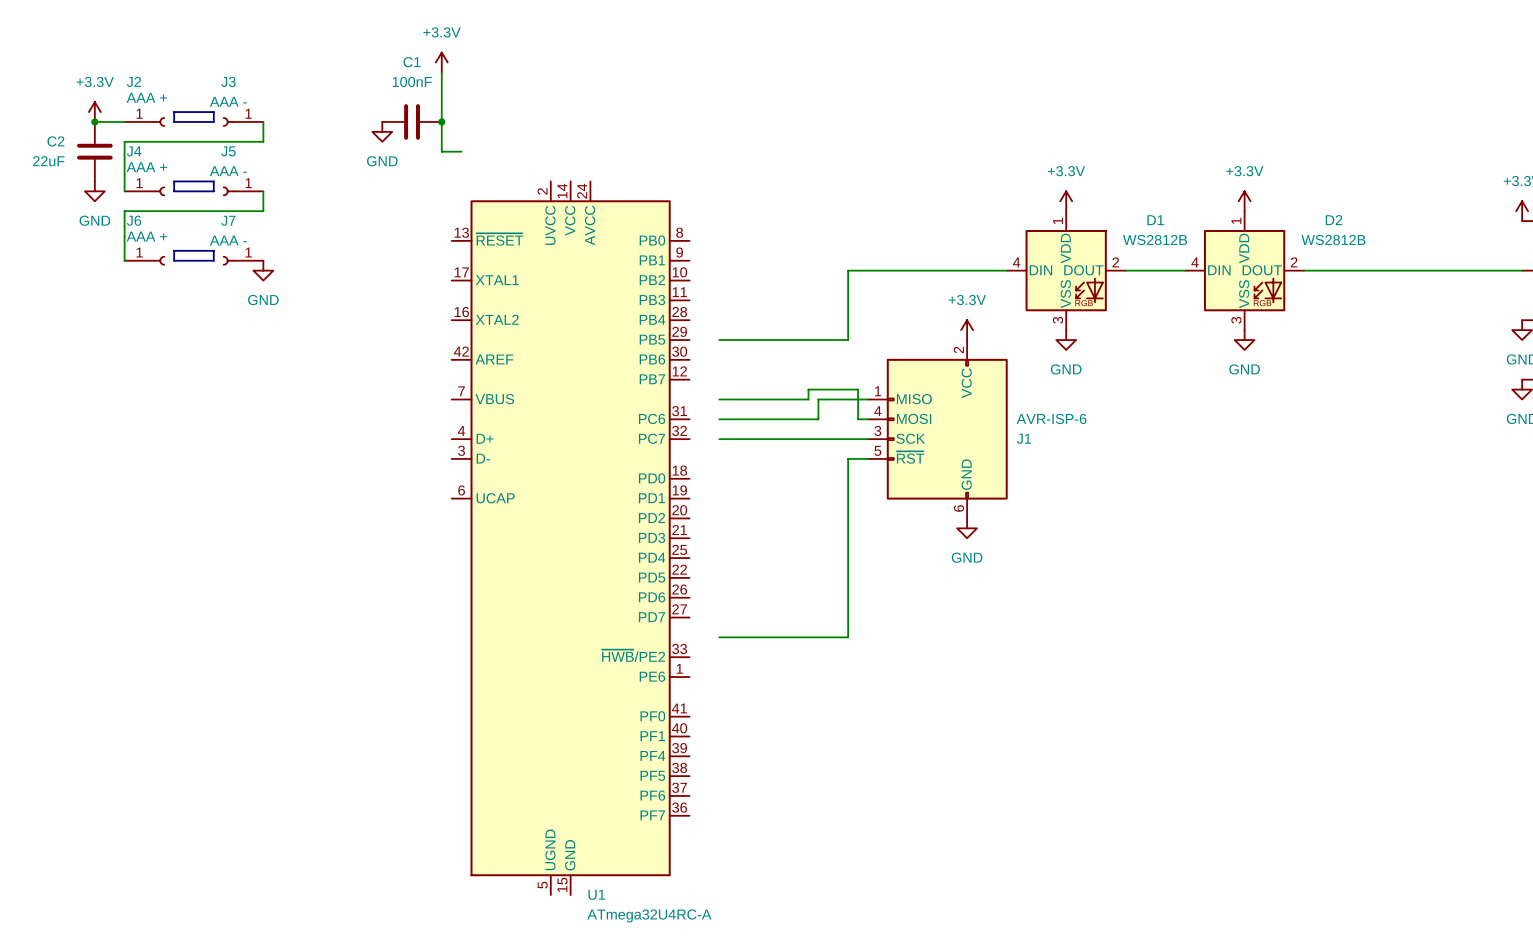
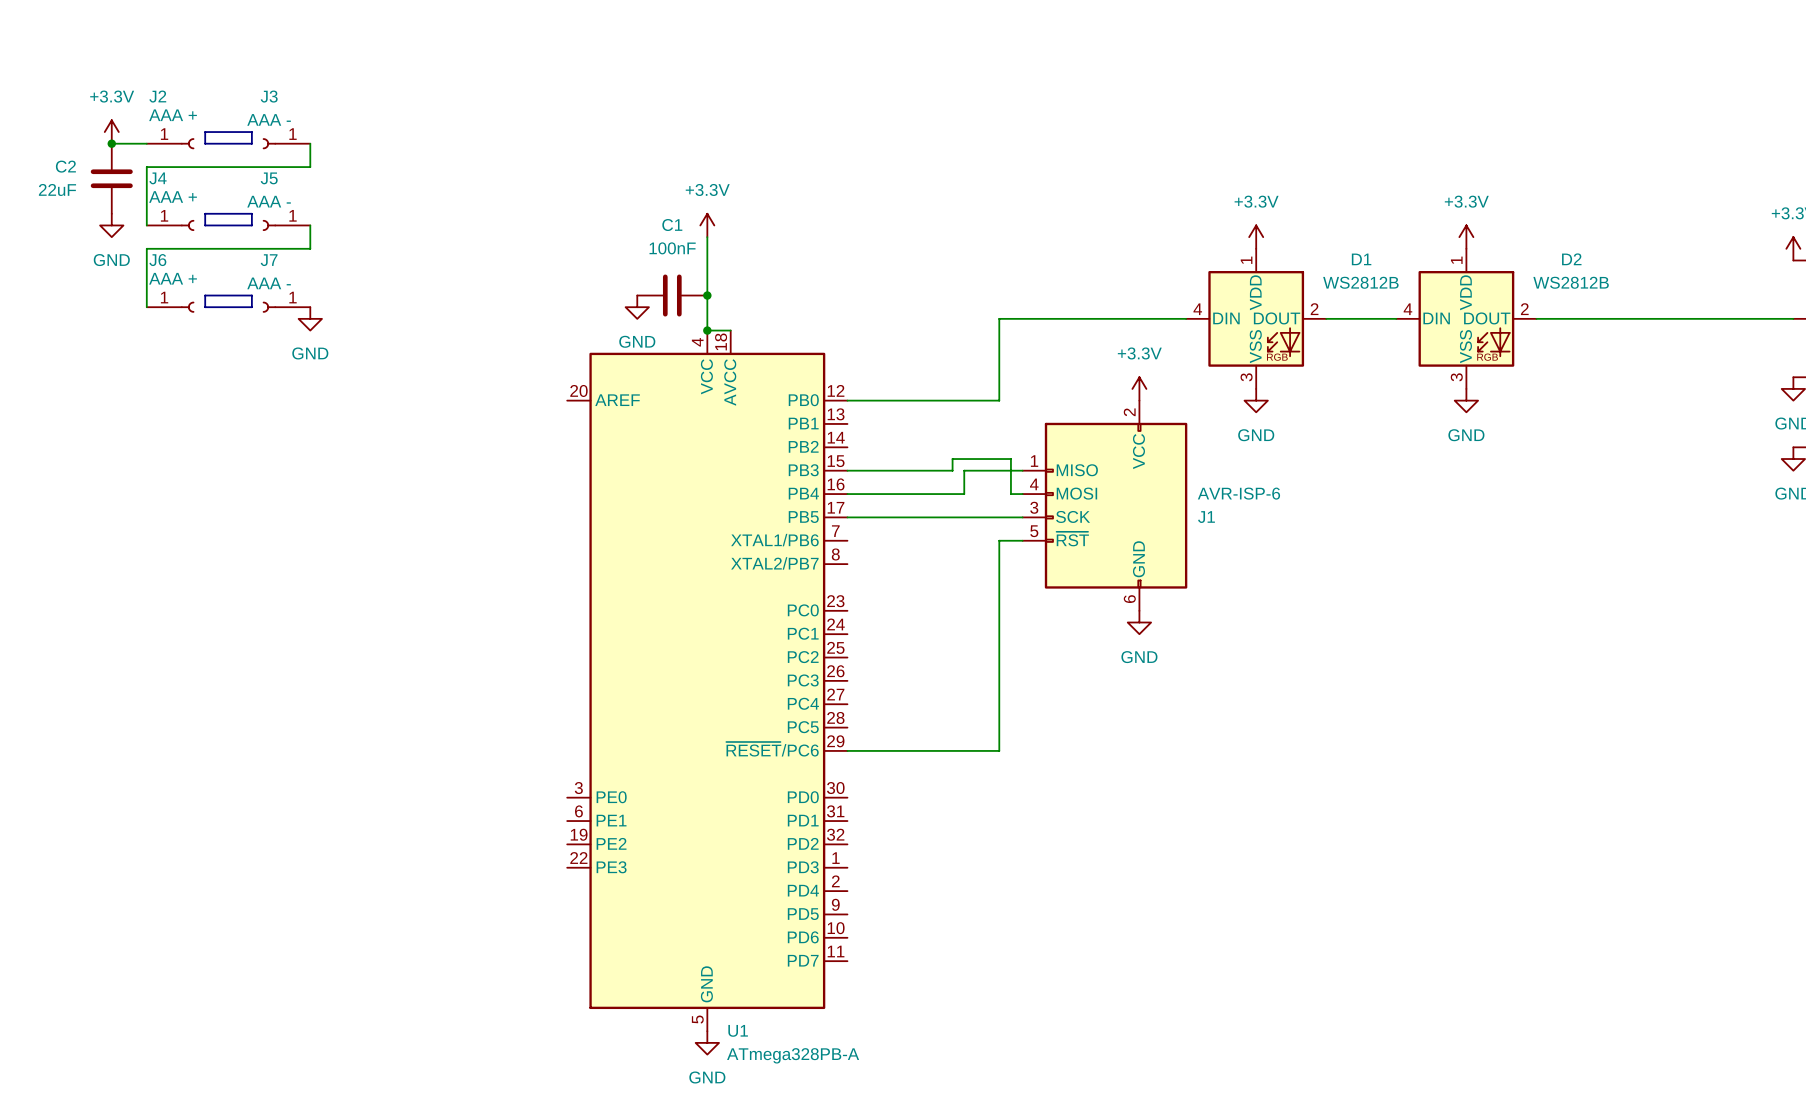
power symbol: +3.3V (441, 62) -> none
wire: (441, 72) (441, 151) (461, 151) -> none
C1 position: (412, 121) -> (672, 295)
junction: (441, 121) -> none
power symbol: GND (382, 131) -> none
U1 symbol: [451, 181, 690, 896] -> [567, 330, 848, 1032]
power symbol: none -> +3.3V (707, 225)
junction: none -> (707, 295)
power symbol: none -> GND (637, 307)
junction: none -> (707, 330)
power symbol: none -> GND (707, 1042)
U1 name position: U1 (596, 894) -> U1 (738, 1030)
U1 value: ATmega32U4RC-A (649, 915) -> ATmega328PB-A (793, 1055)

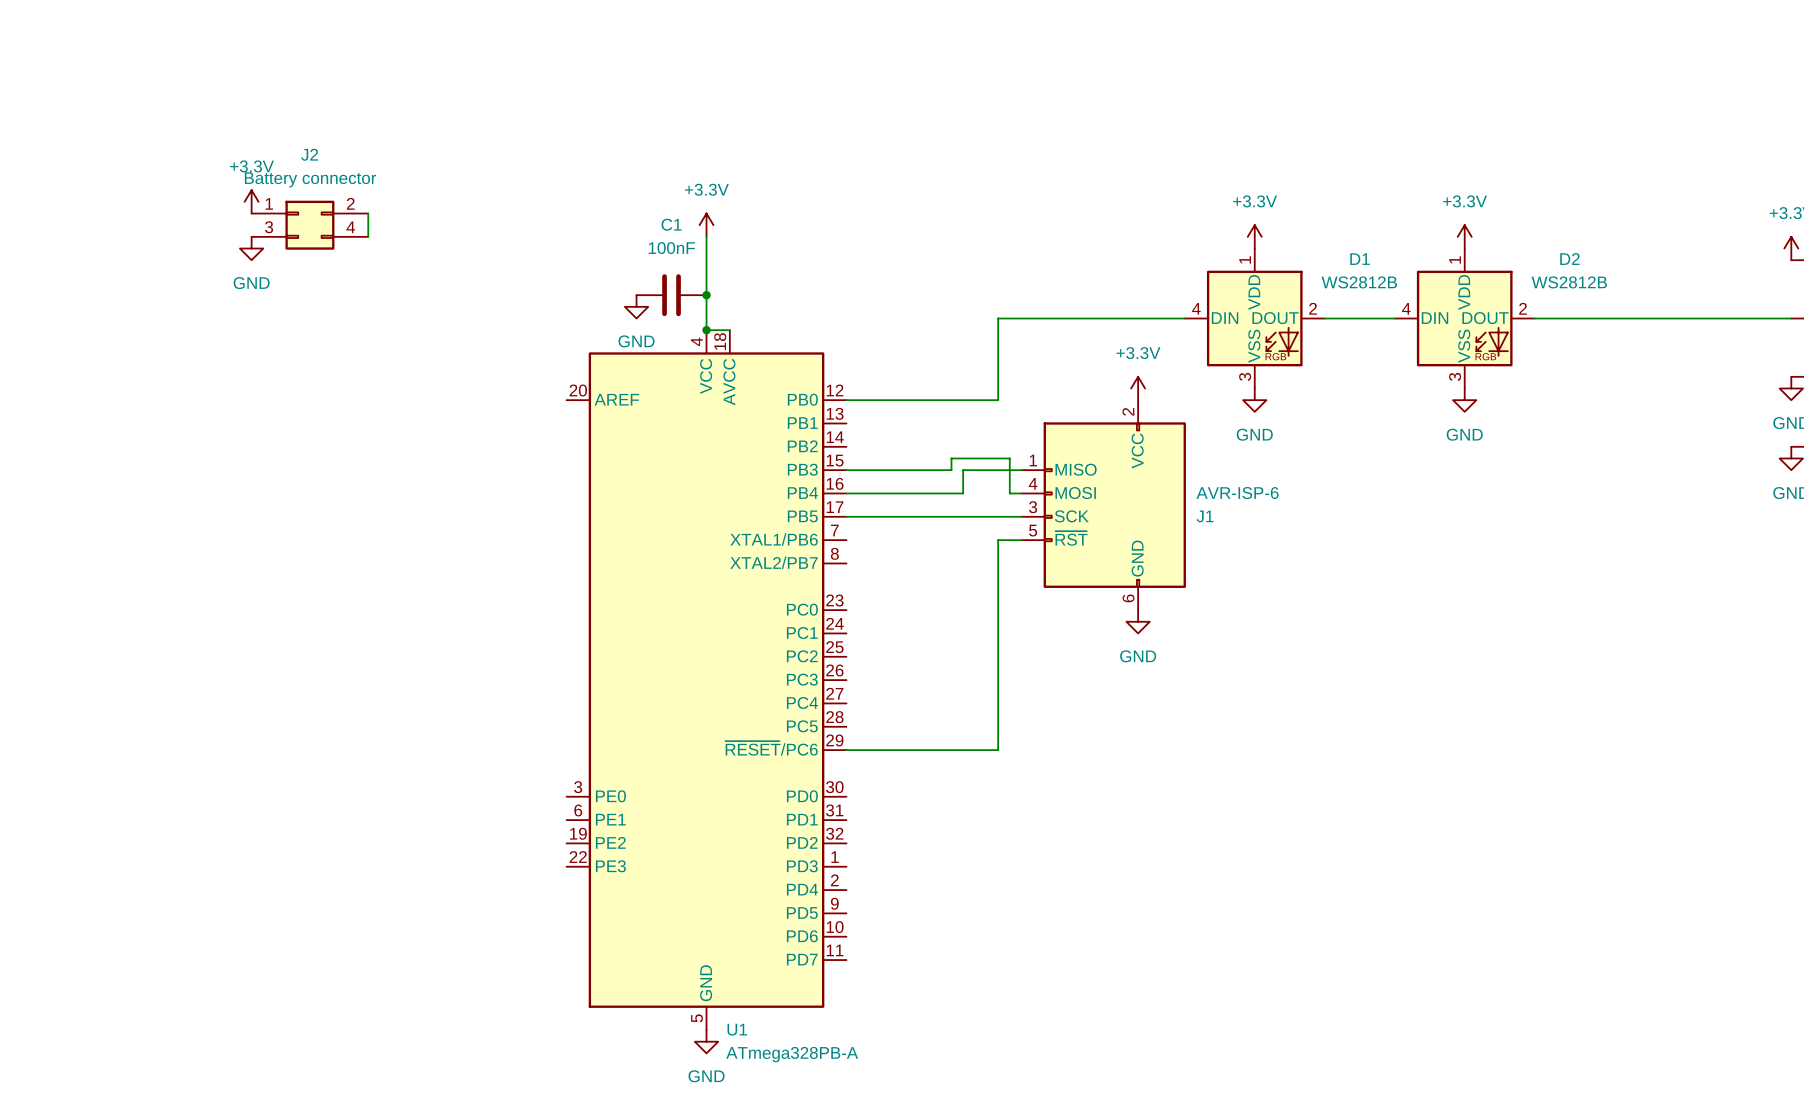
J2 name position: J2 (157, 96) -> J2 (309, 154)
J2 value: AAA + (173, 115) -> Battery connector (310, 179)
power symbol position: +3.3V (111, 132) -> +3.3V (251, 201)
line: (205, 132) (251, 132) (251, 143) (205, 143) (205, 132) -> none
J2 symbol: [146, 138, 195, 150] -> [251, 200, 369, 250]
wire: (111, 143) (146, 143) -> none
junction: (111, 143) -> none
J3: AAA - (286, 143) -> none
wire: (310, 143) (310, 167) (146, 167) (146, 225) -> none
C2: 22uF (111, 178) -> none
line: (205, 213) (205, 225) (251, 225) (251, 213) (205, 213) -> none
wire: none -> (368, 213) (368, 236)
power symbol: GND (111, 225) -> none
J4: AAA + (170, 225) -> none
J5: AAA - (286, 225) -> none
wire: (310, 225) (310, 248) (146, 248) (146, 307) -> none
power symbol: none -> GND (251, 248)
line: (205, 295) (205, 307) (251, 307) (251, 295) (205, 295) -> none
J6: AAA + (170, 307) -> none
J7: AAA - (286, 307) -> none
power symbol: GND (310, 318) -> none

